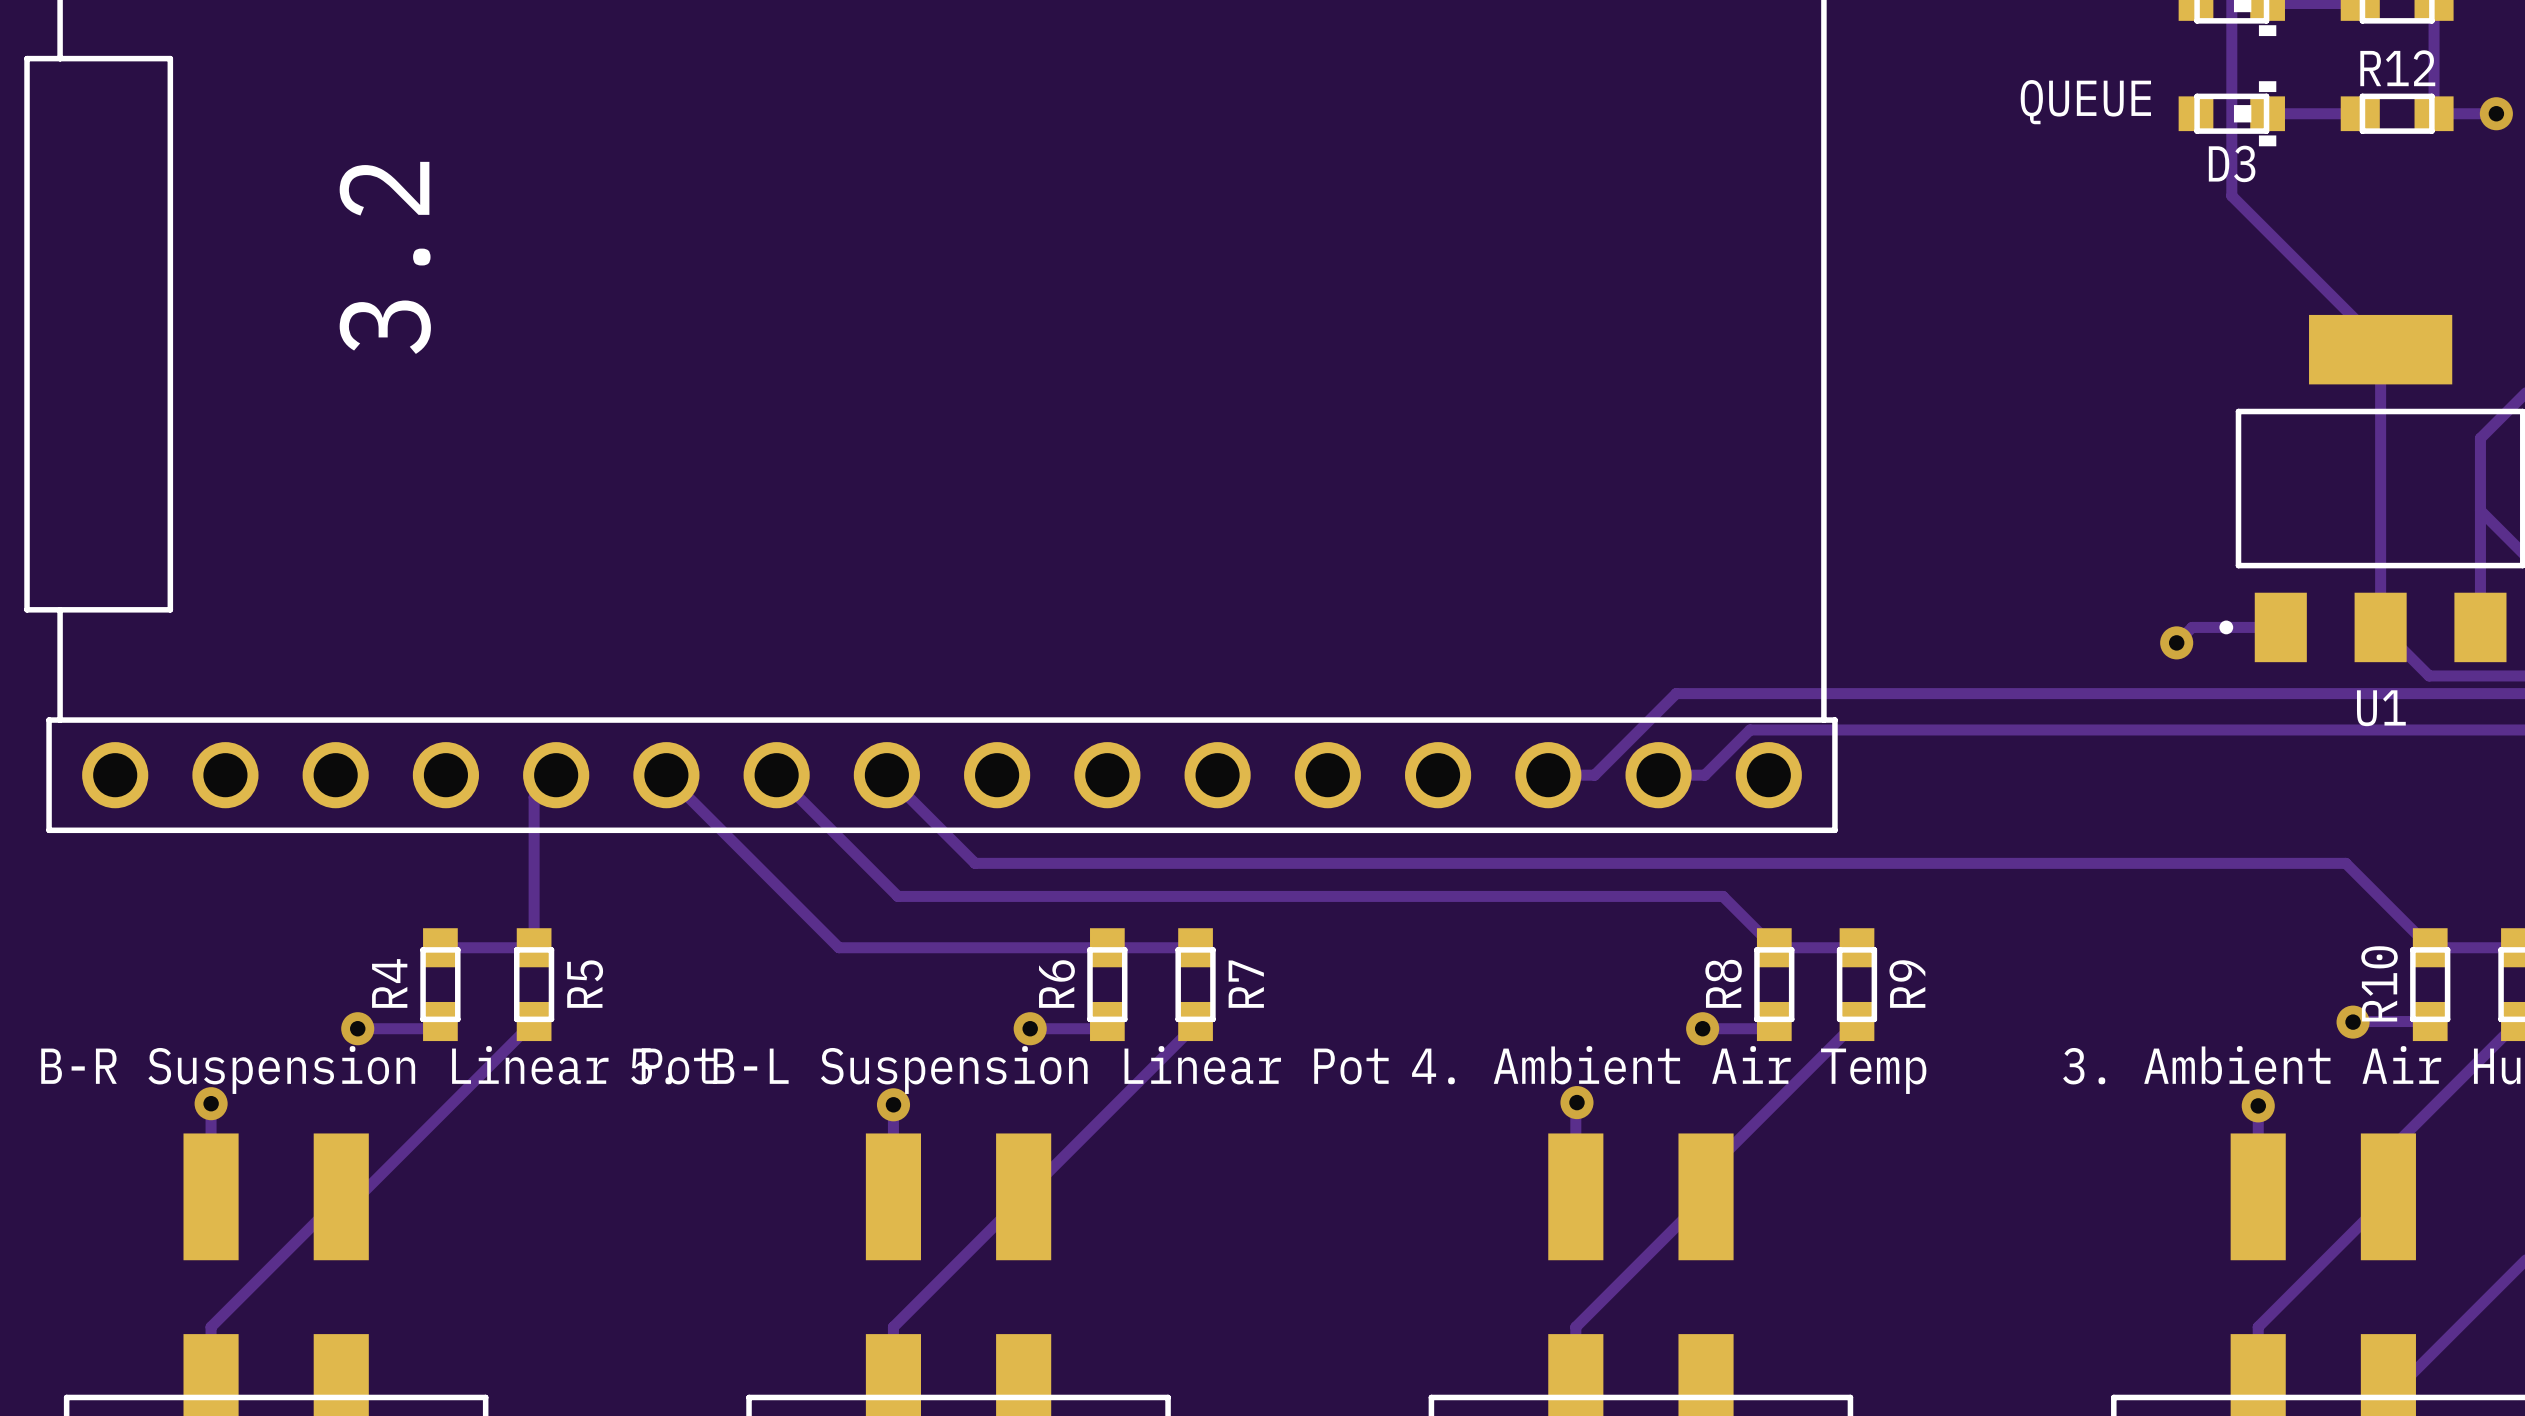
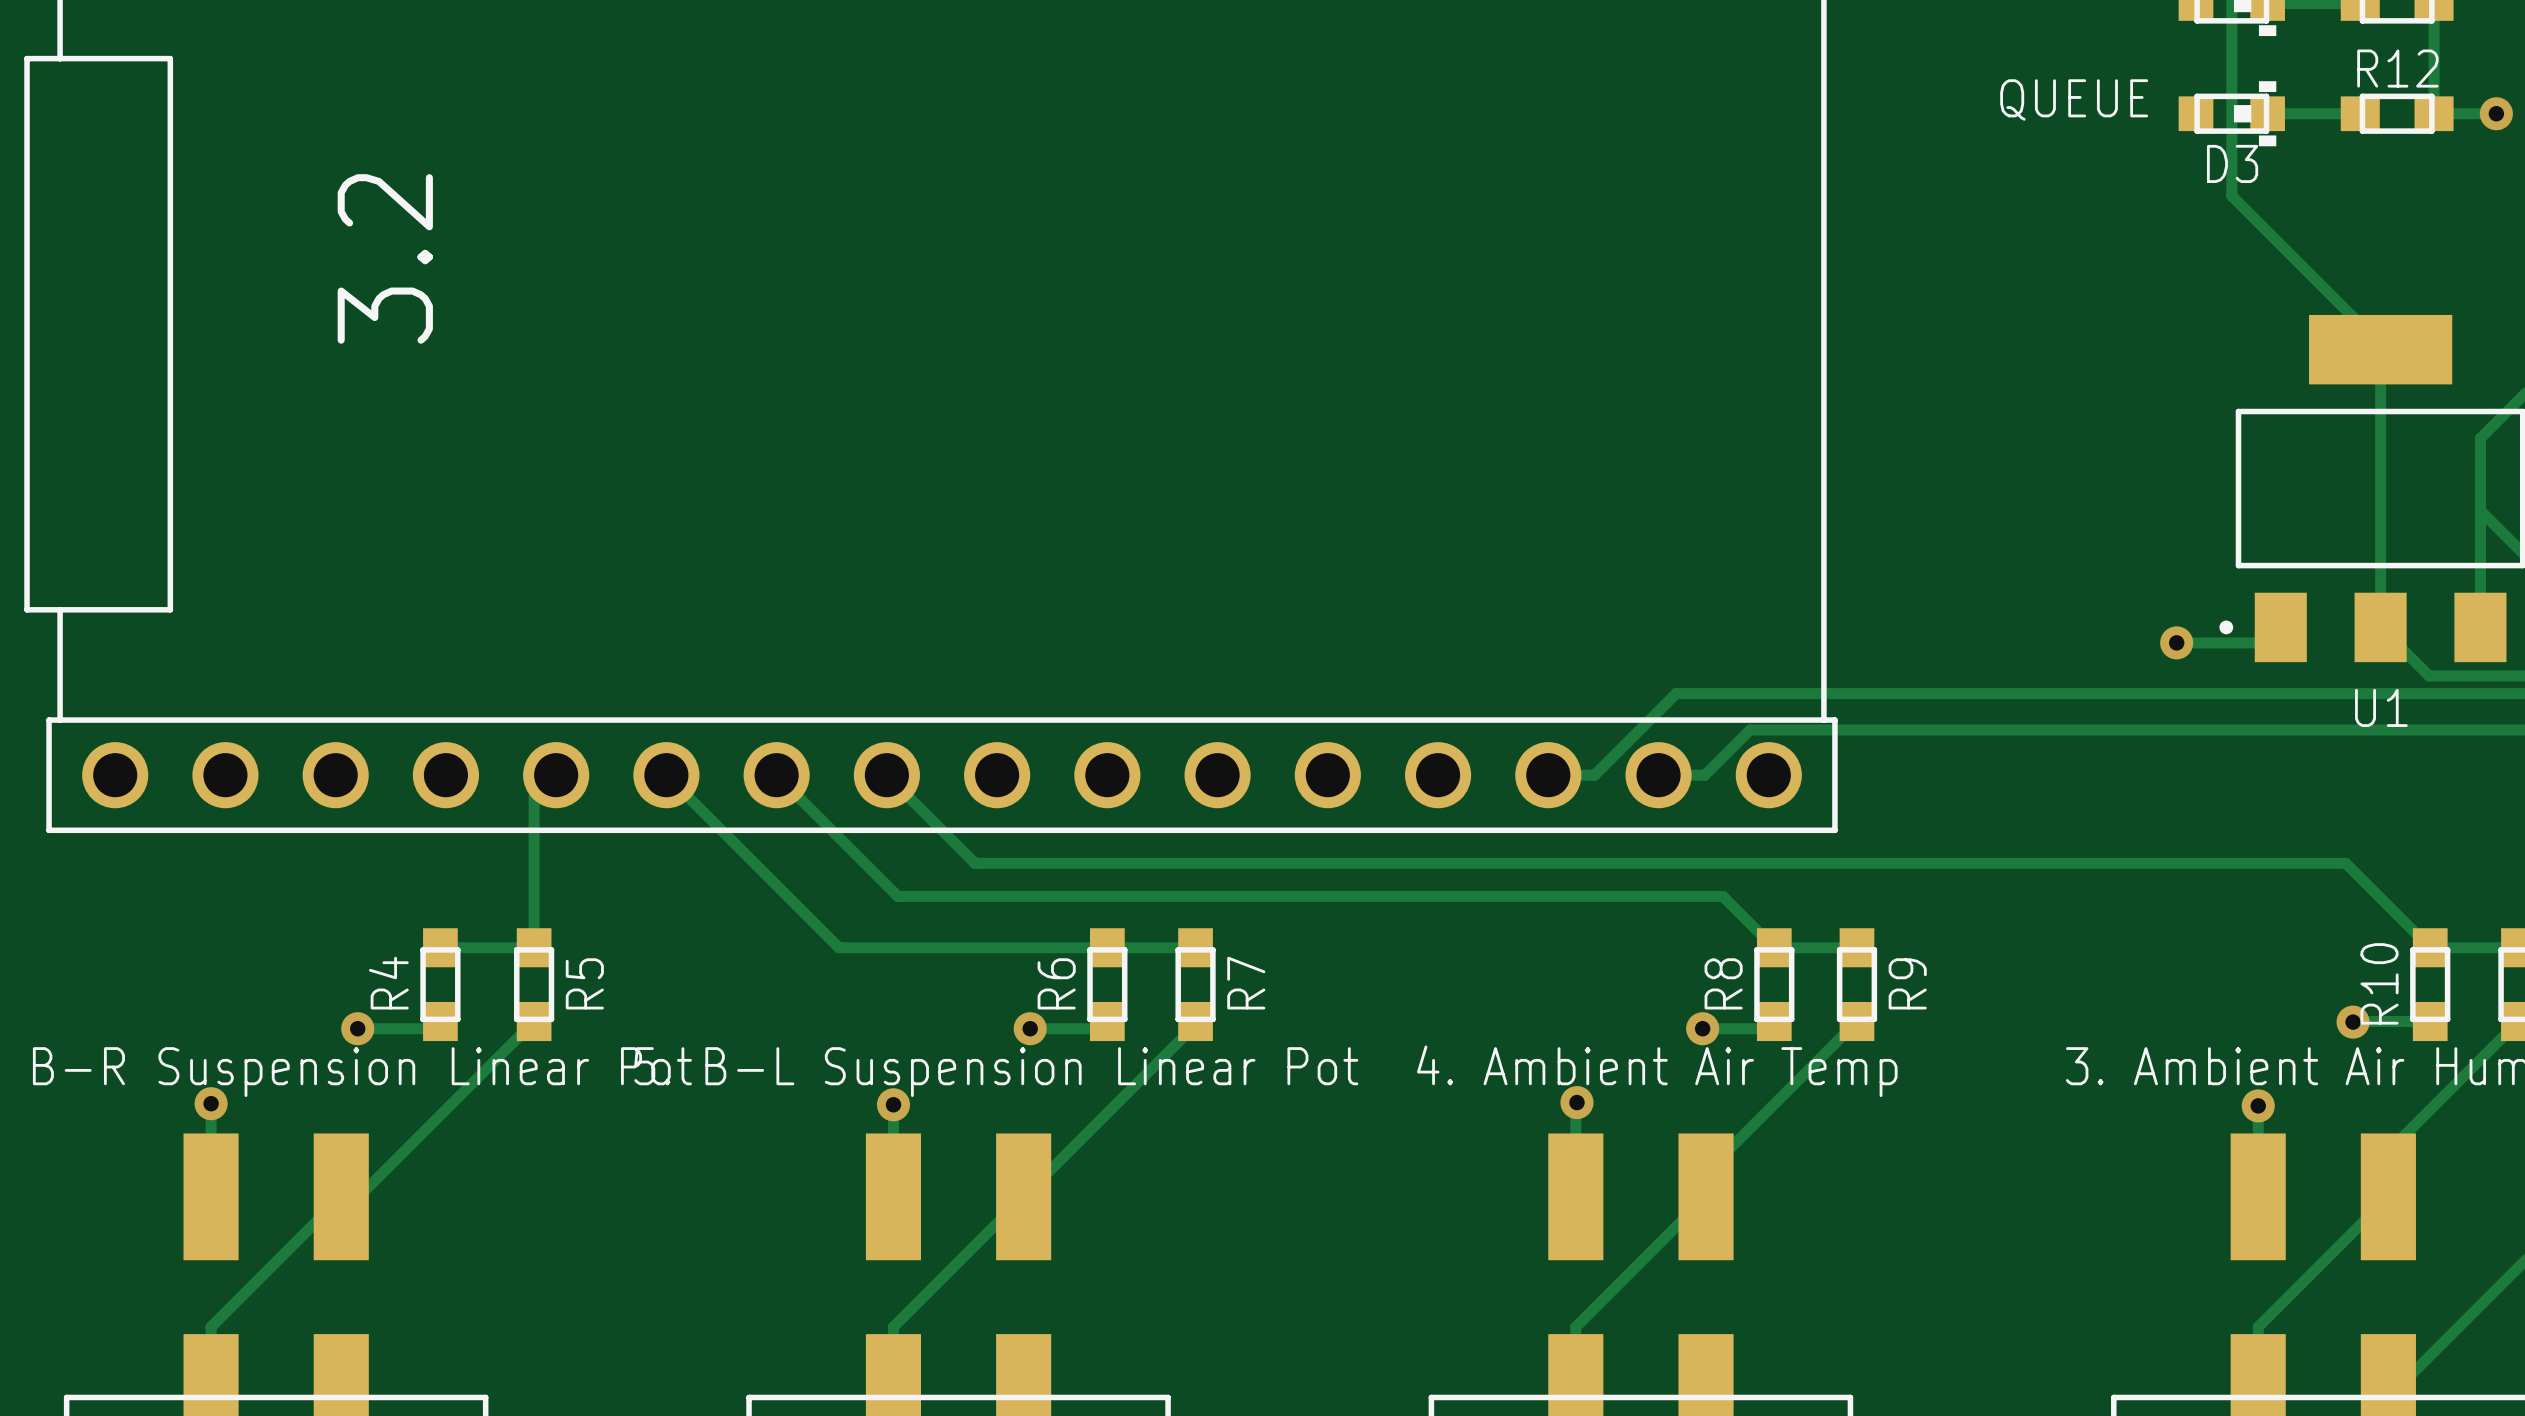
track: (2280, 627) (2192, 627) (2176, 642) -> (2283, 630) (2280, 627) (2265, 642) (2176, 642)

